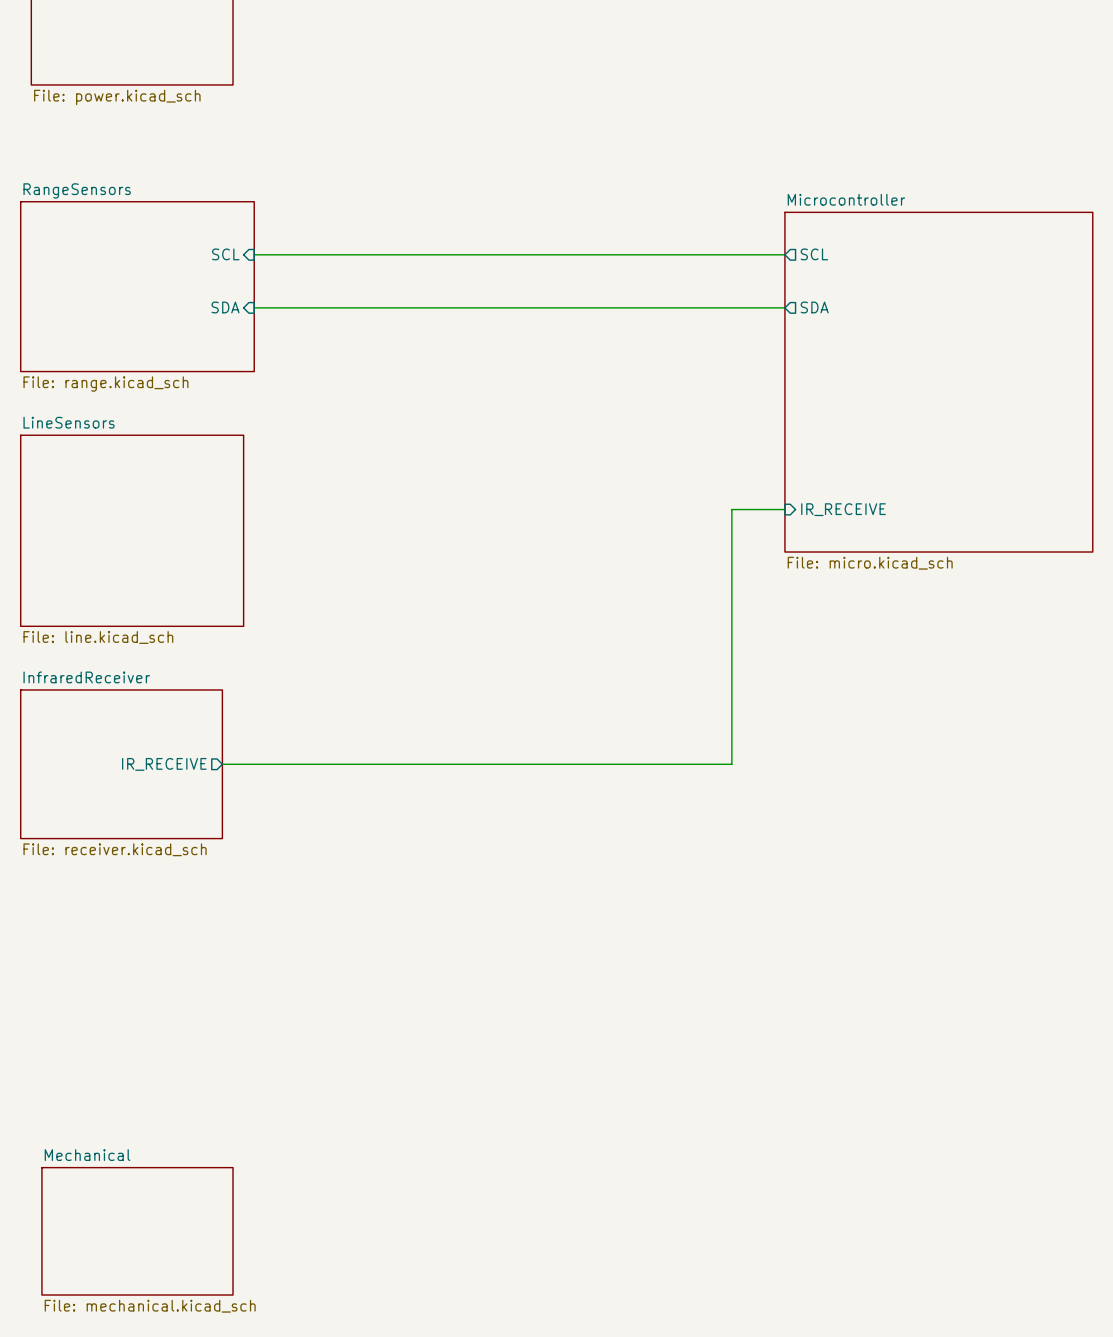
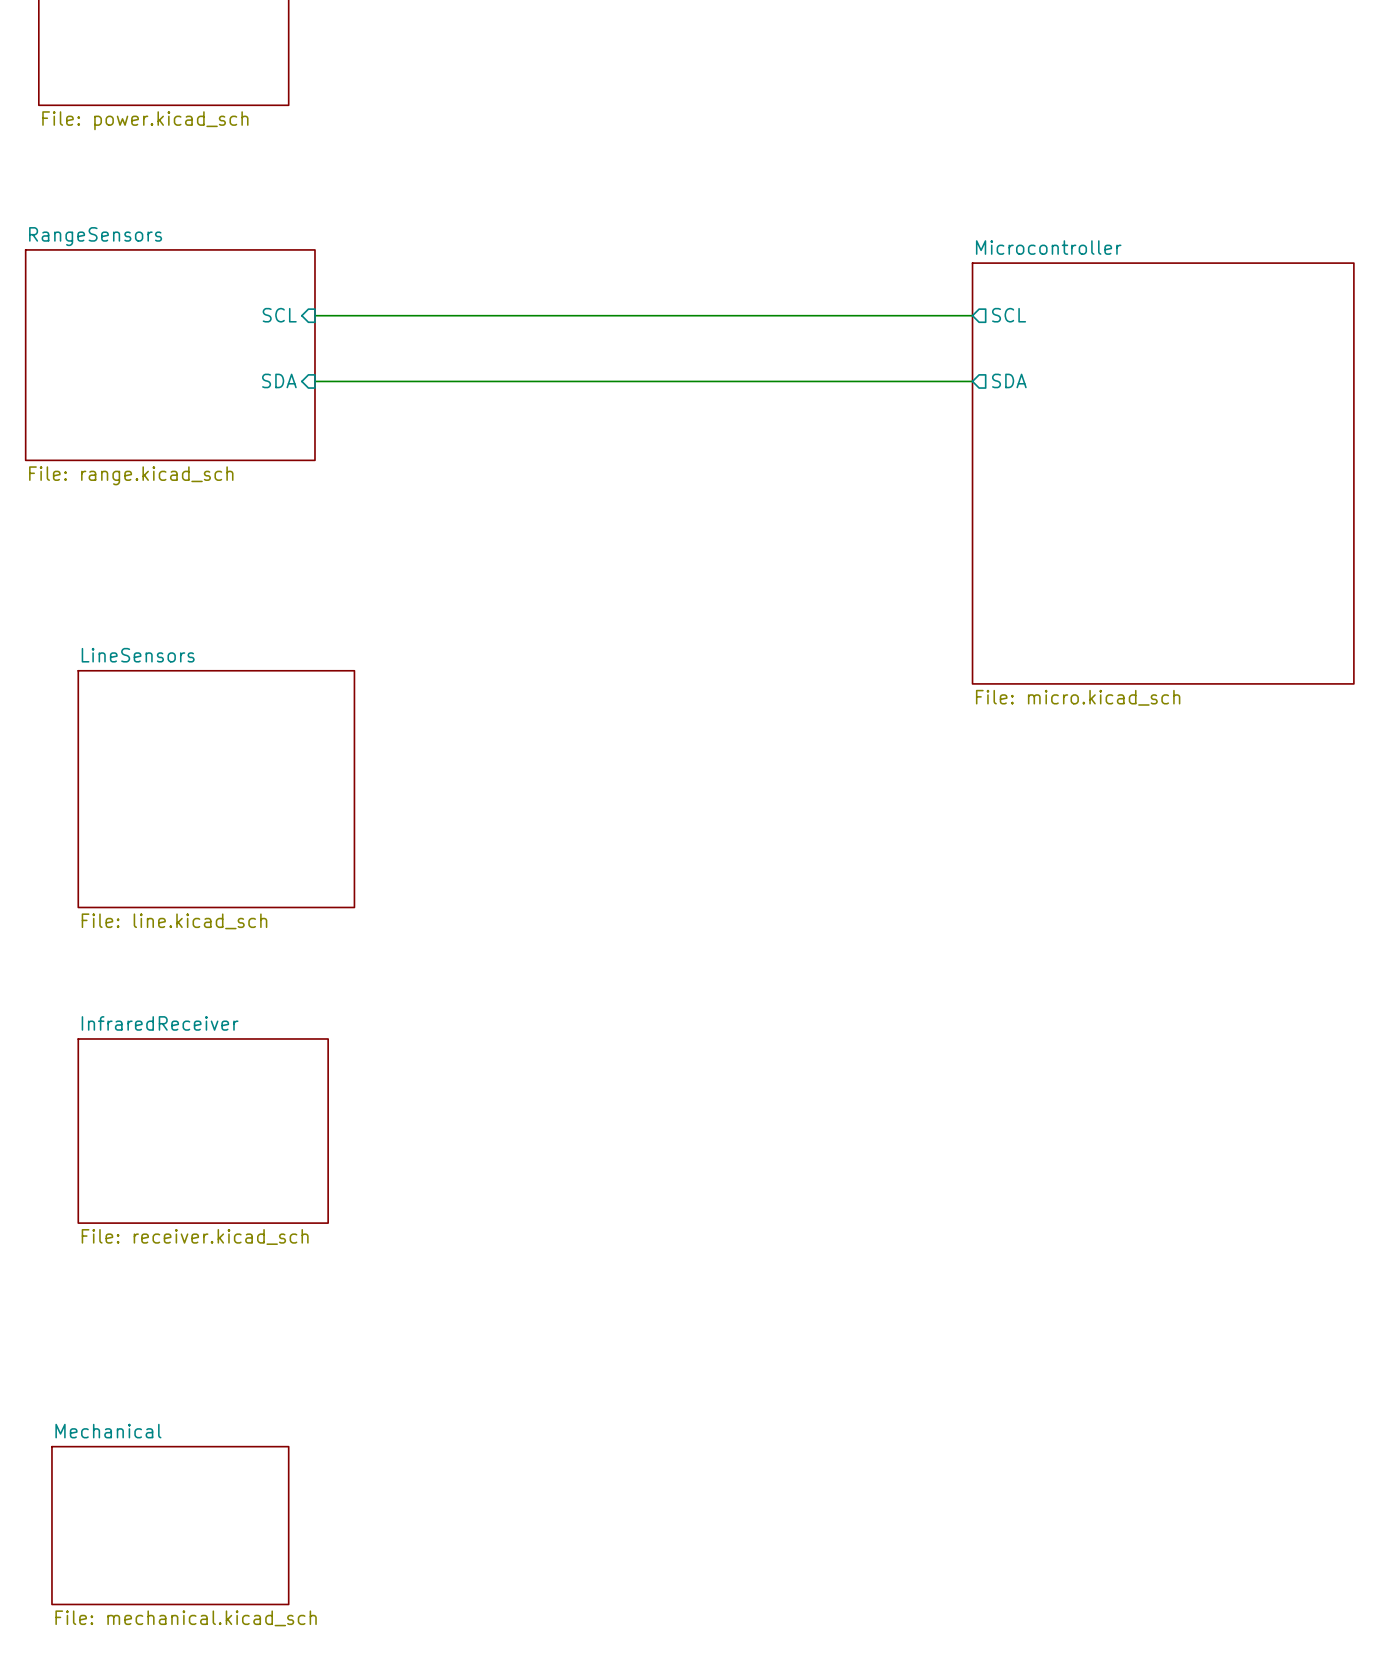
wire: (784, 509) (731, 509) (731, 764) (222, 764) -> none
sheet pin: IR_RECEIVE (843, 509) -> none
sheet LineSensors position: (132, 530) -> (216, 789)
sheet InfraredReceiver position: (121, 764) -> (203, 1131)
sheet pin: IR_RECEIVE (164, 764) -> none

